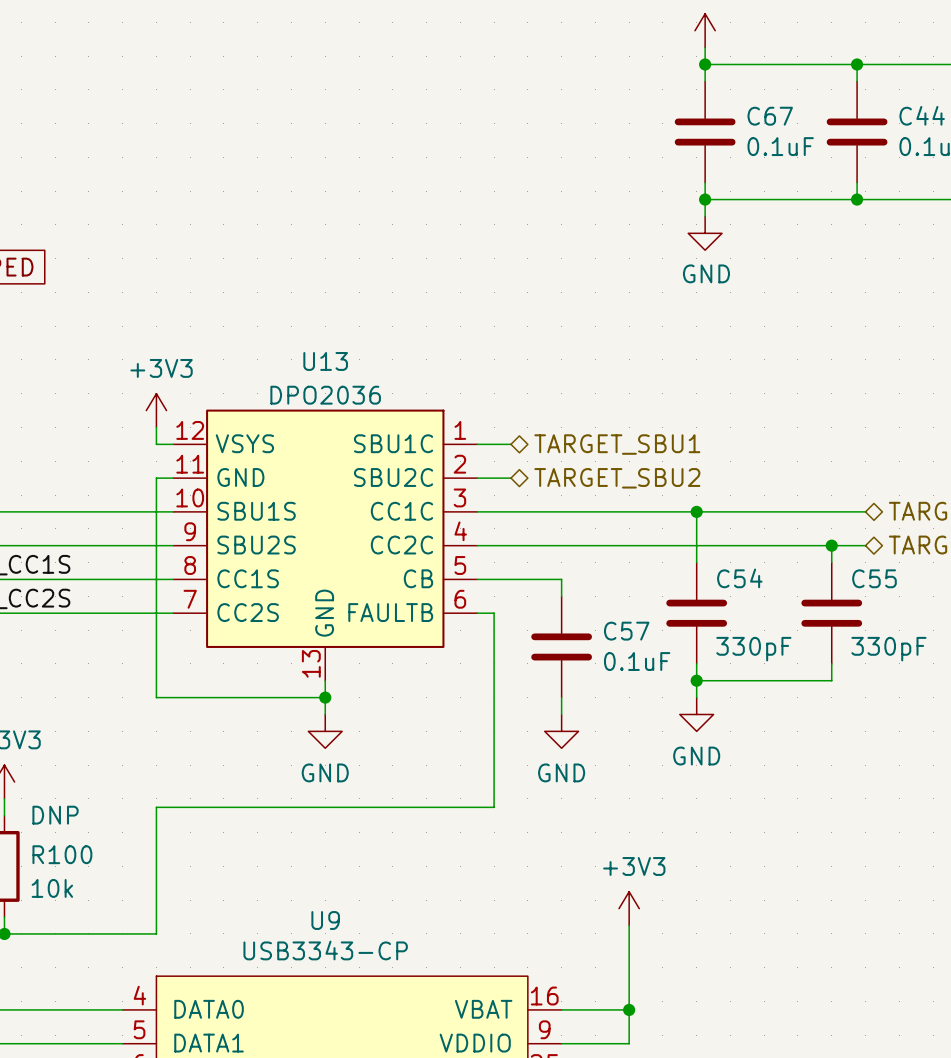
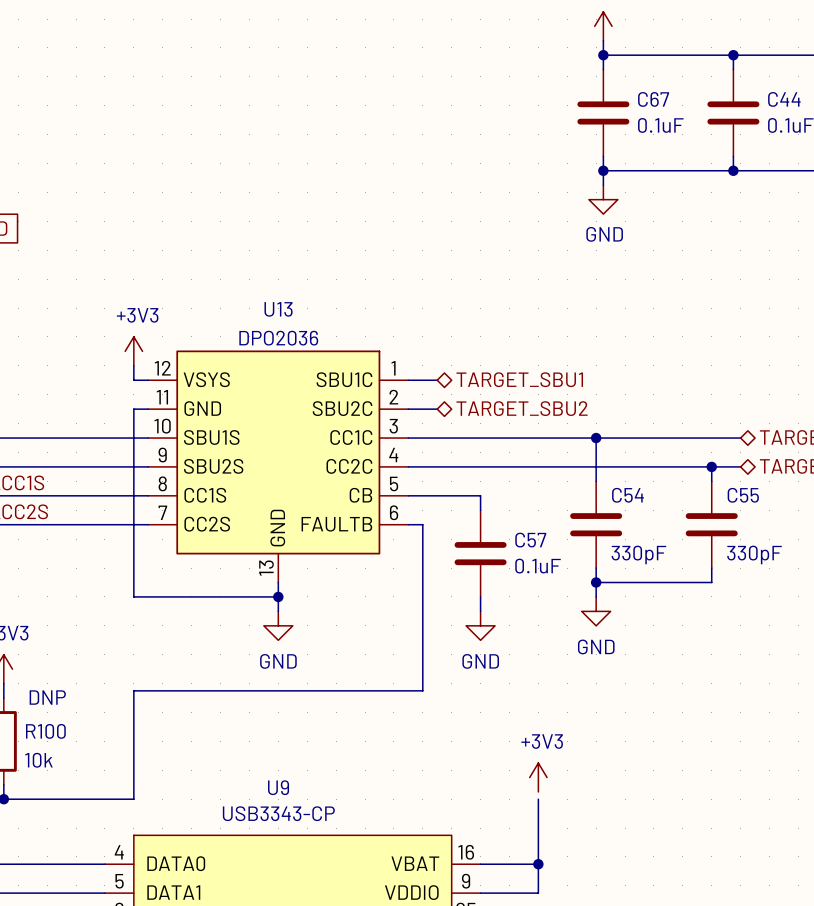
wire: (629, 925) (629, 933) -> none

